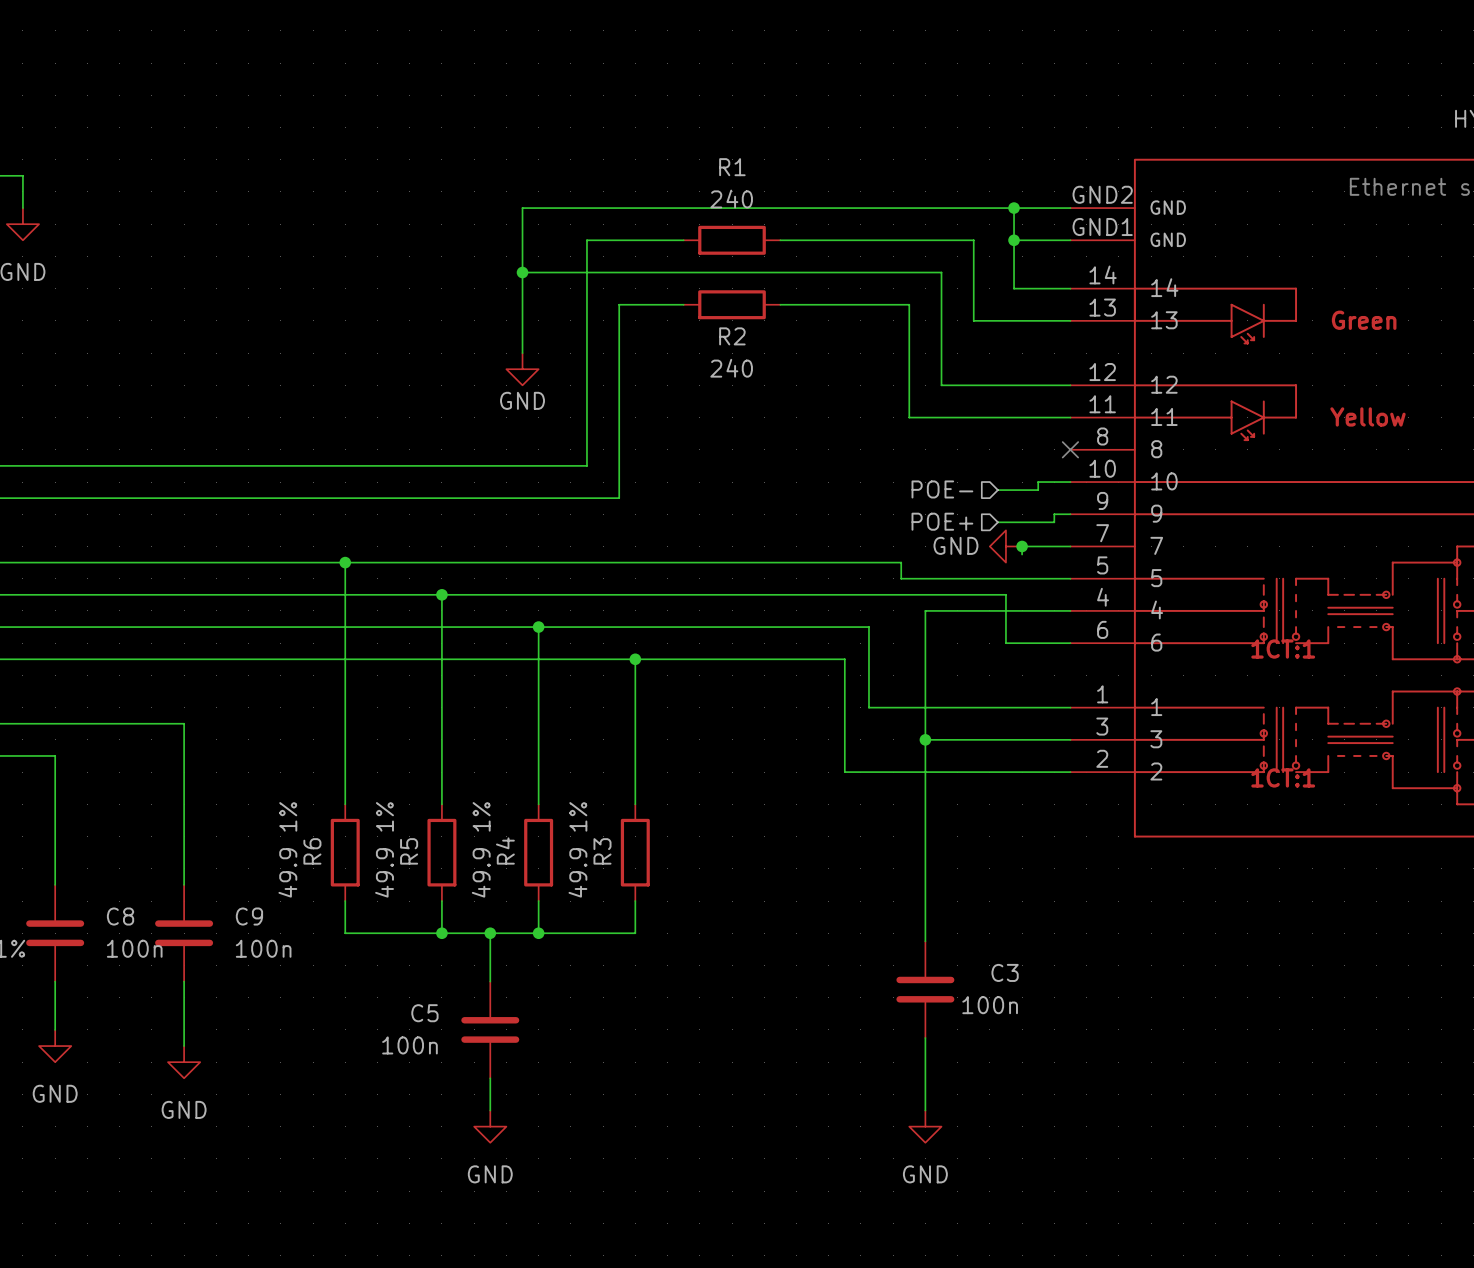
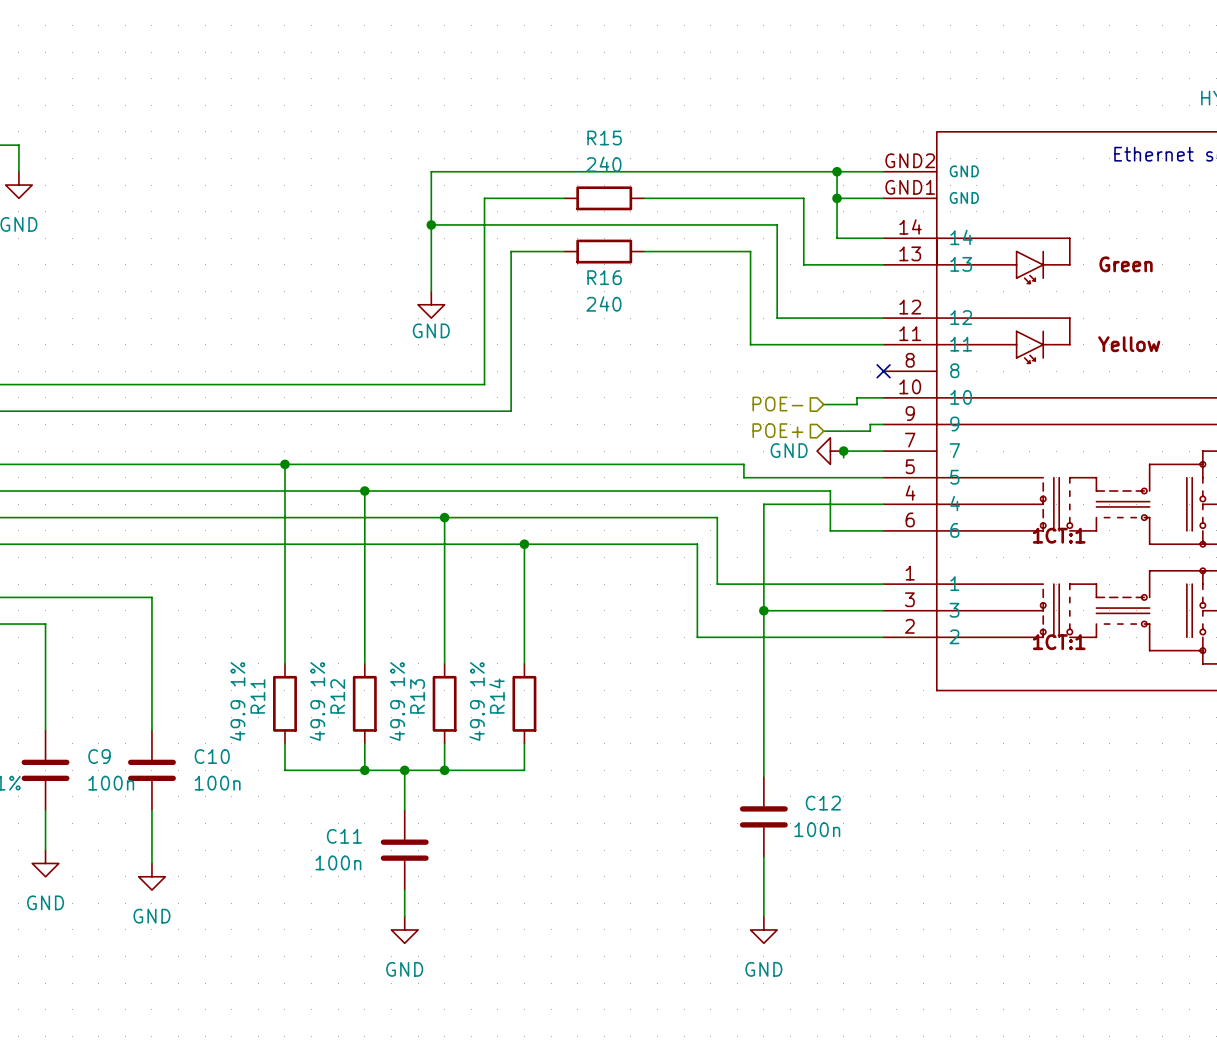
R1 name: R1 (732, 167) -> R15 (604, 137)
R2 name: R2 (732, 336) -> R16 (604, 277)
R6 name: R6 (312, 851) -> R11 (257, 696)
R5 name: R5 (409, 851) -> R12 (337, 696)
R4 name: R4 (505, 851) -> R13 (417, 696)
R3 name: R3 (602, 851) -> R14 (497, 696)
C8 name: C8 (120, 916) -> C9 (99, 756)
C9 name: C9 (249, 916) -> C10 (212, 756)
C3 name: C3 (1005, 972) -> C12 (823, 803)
C5 name: C5 (424, 1013) -> C11 (344, 836)

